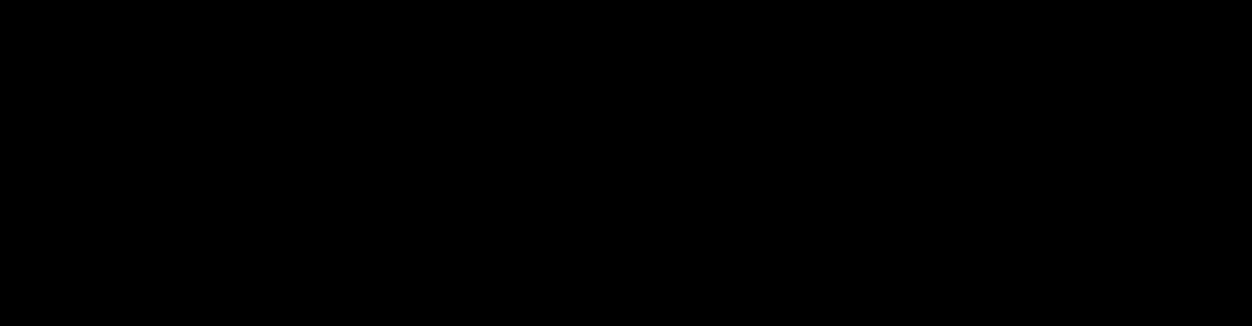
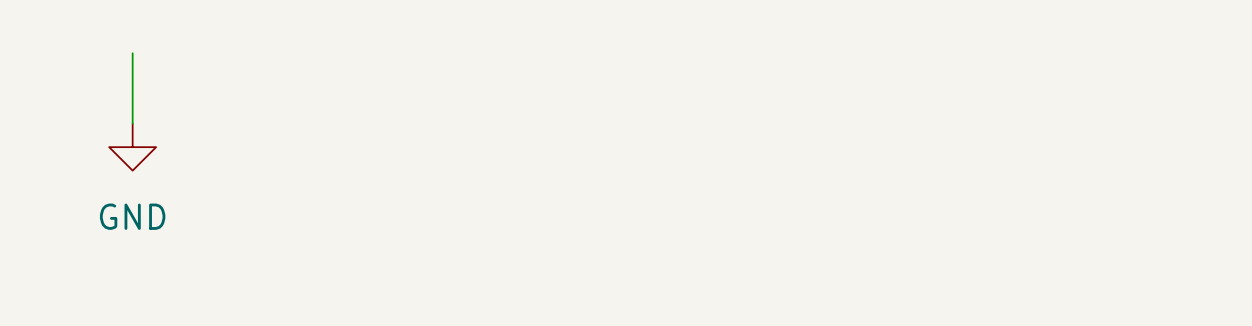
wire: none -> (132, 53) (132, 123)
power symbol: none -> GND (132, 147)

